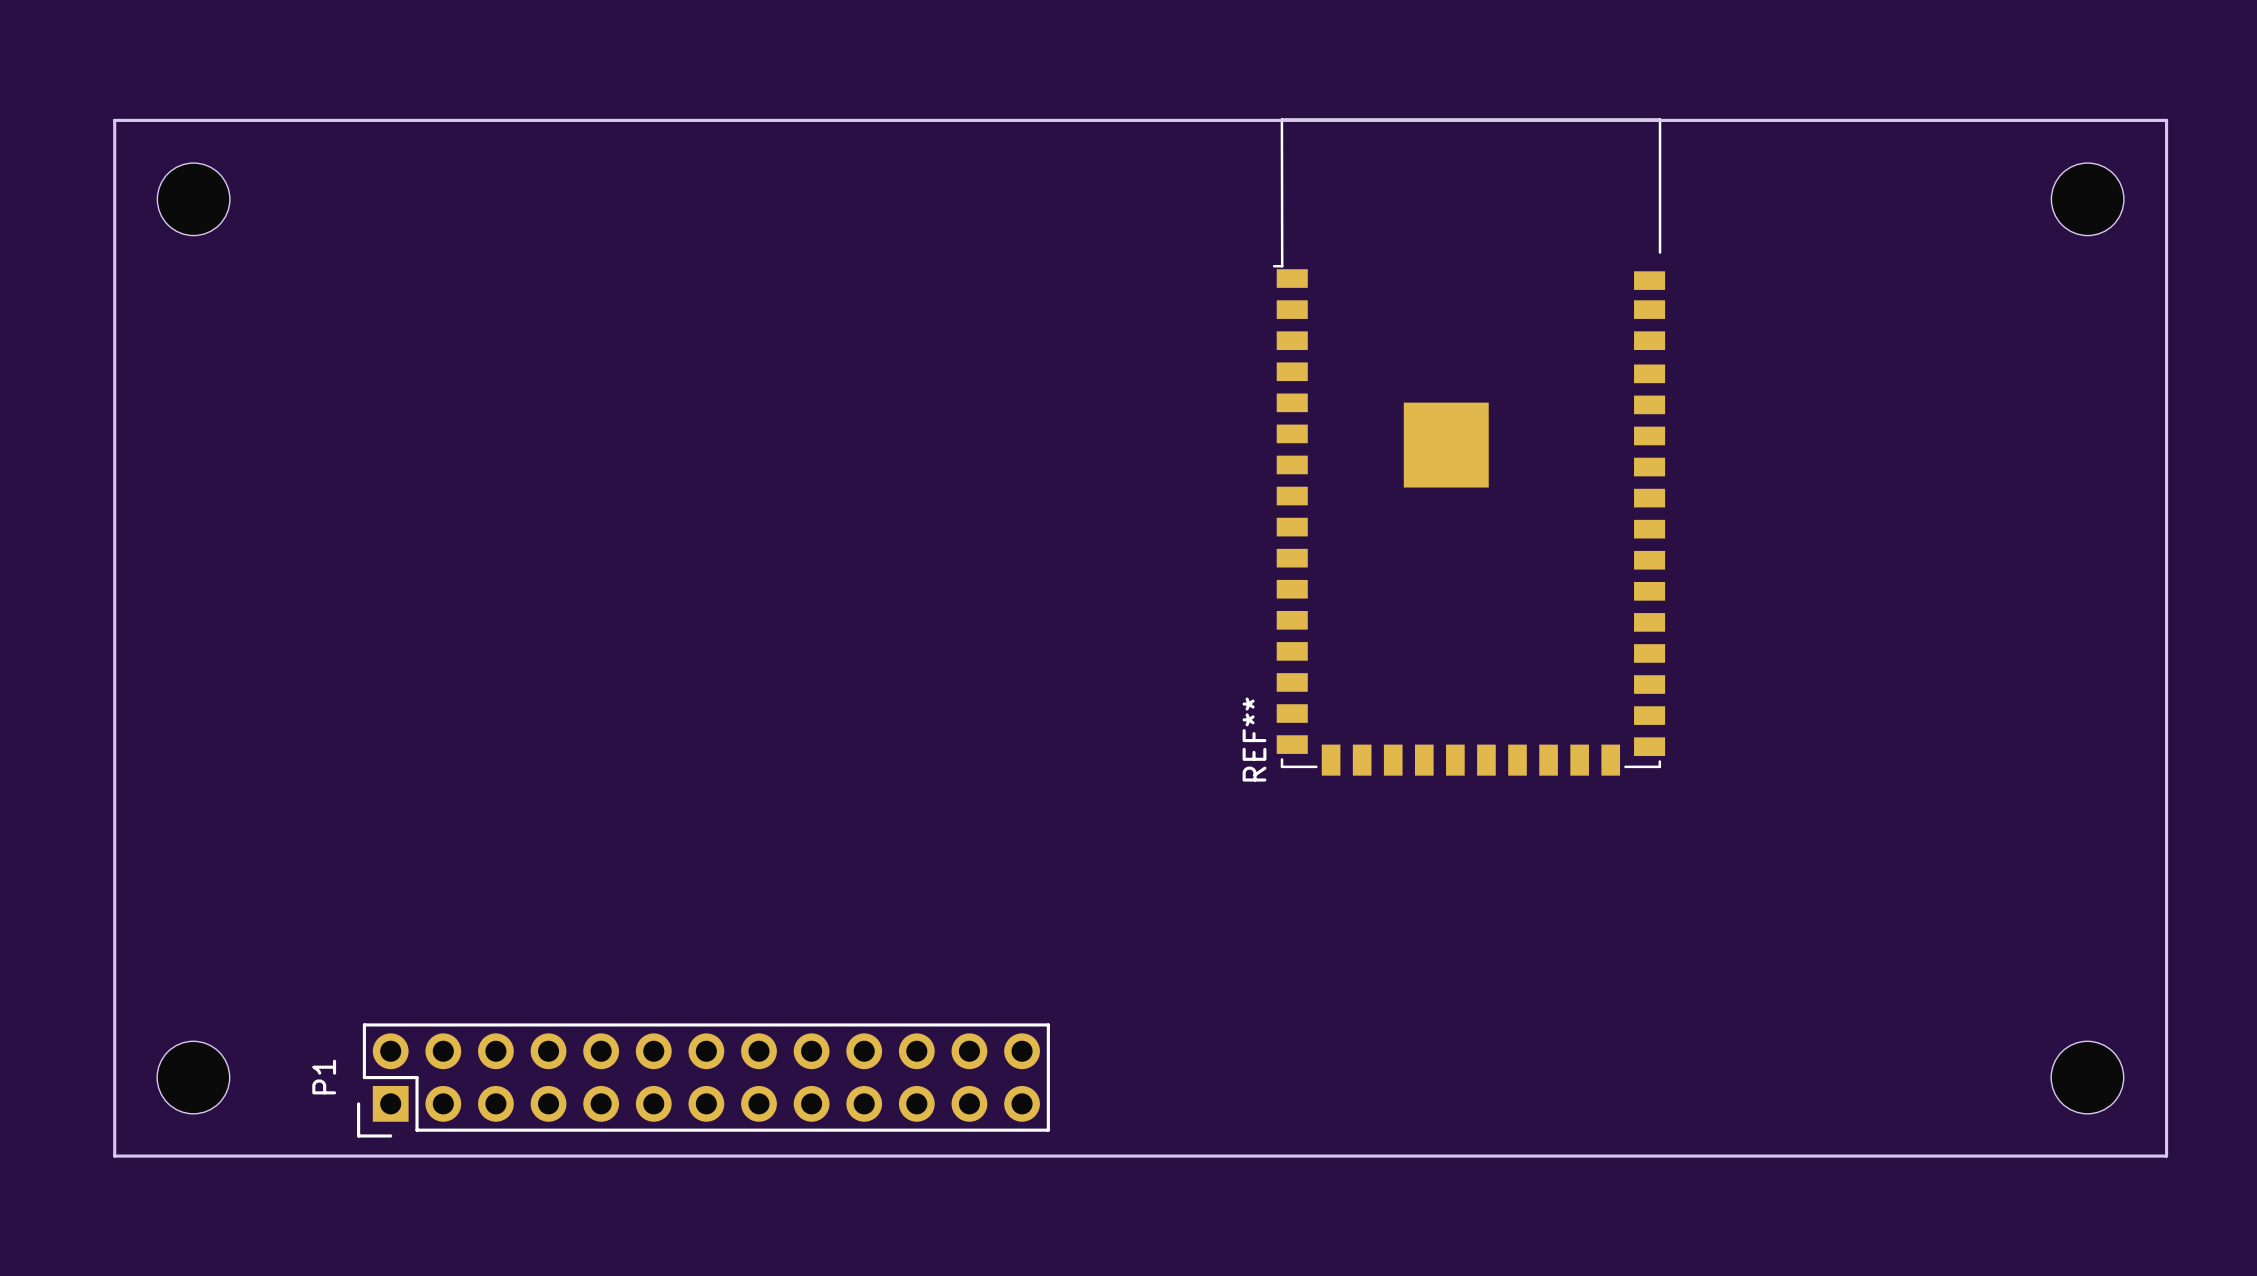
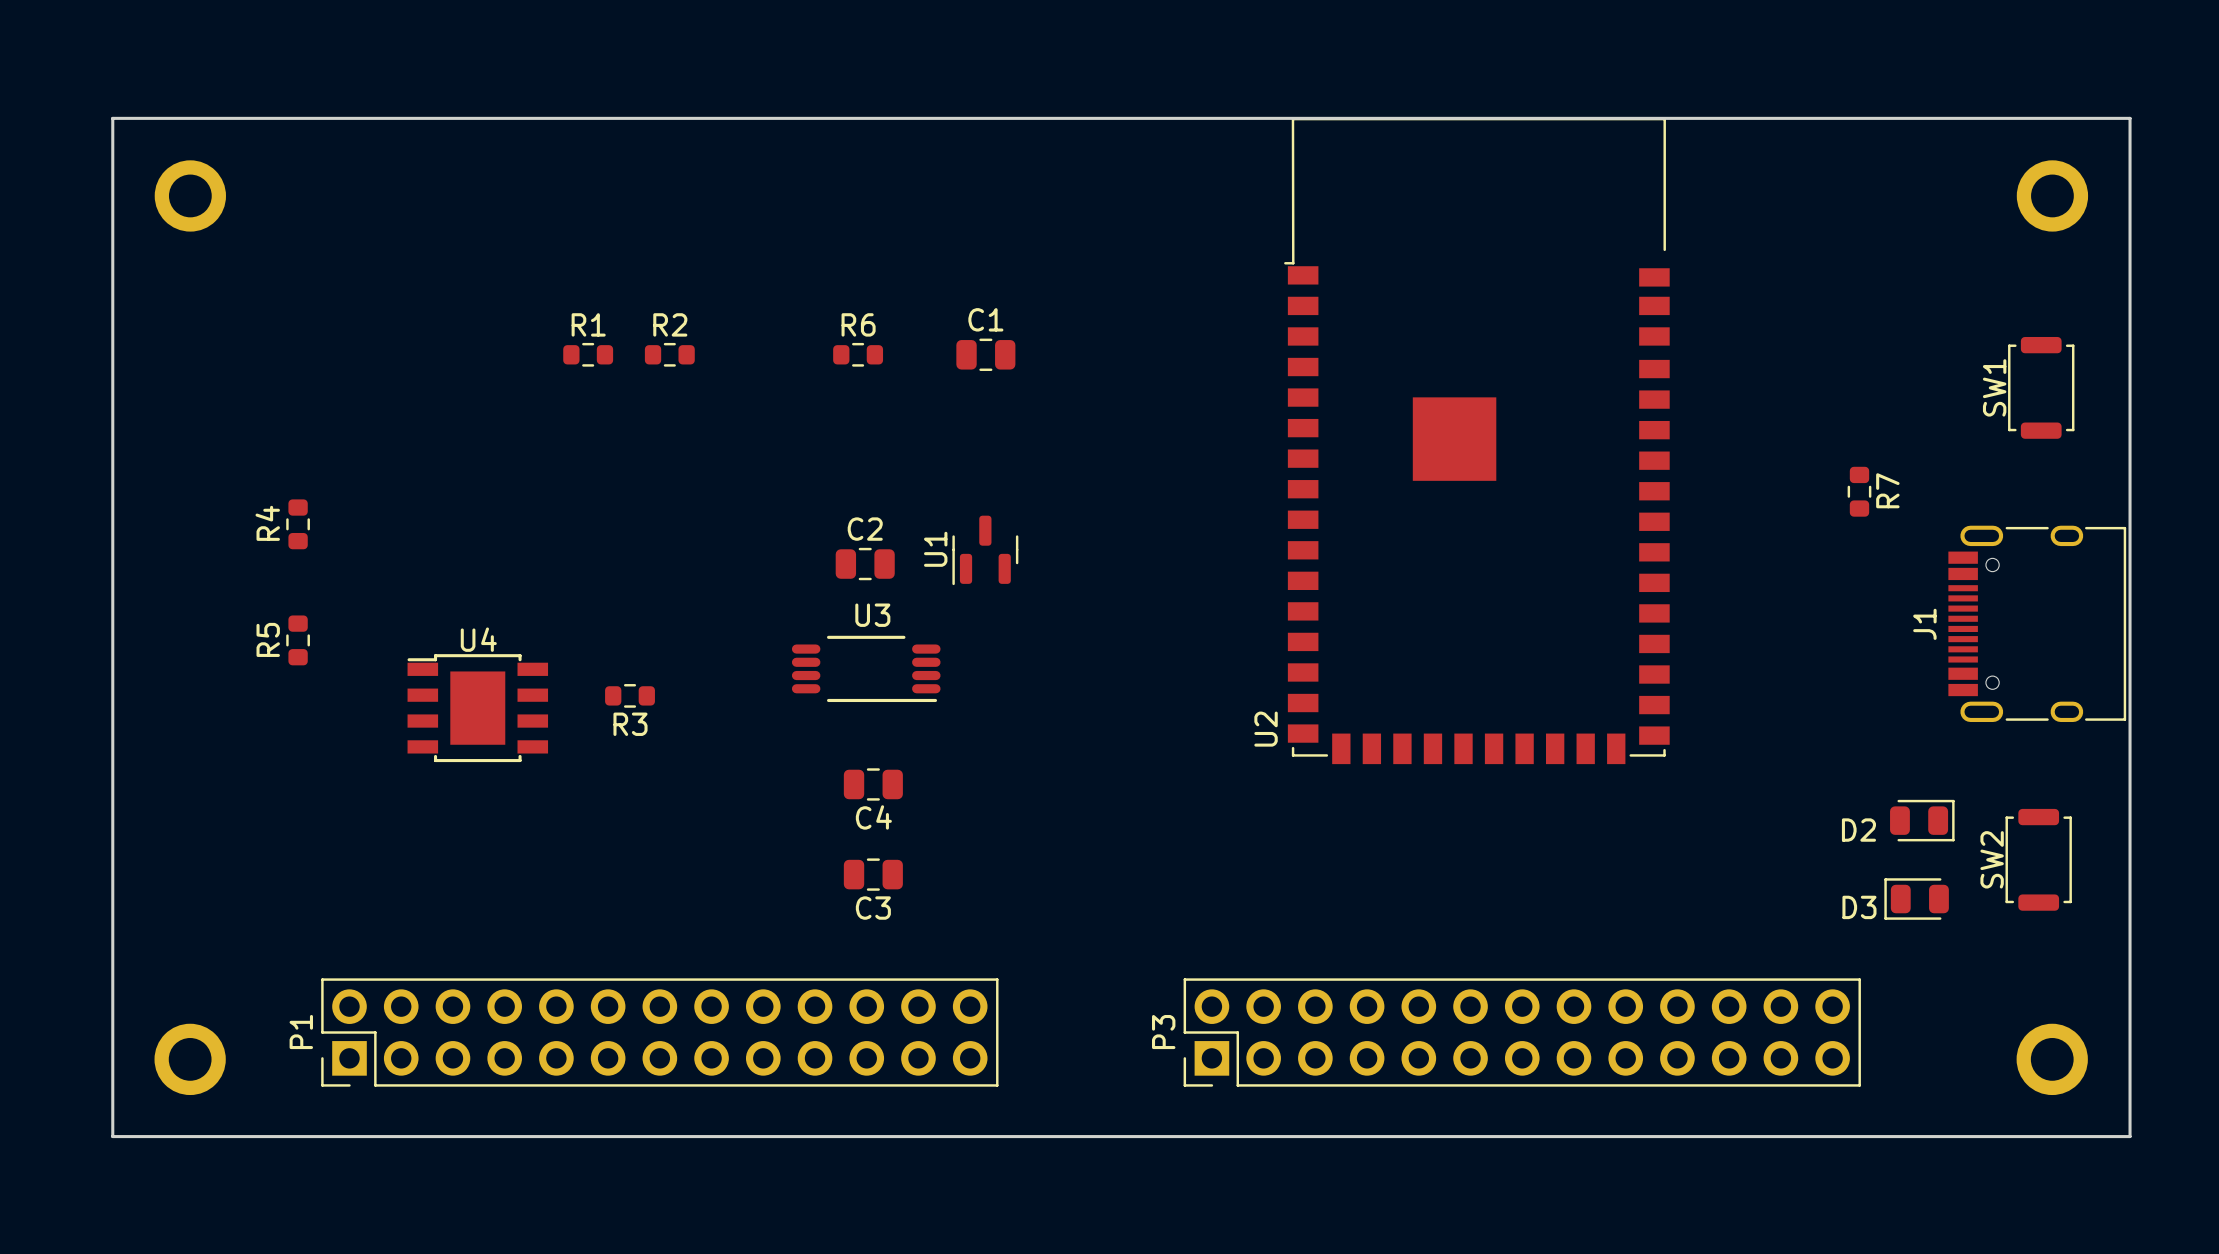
part footprint: [157, 163, 230, 236] -> [154, 160, 226, 232]
part footprint: [2051, 163, 2124, 236] -> [2016, 160, 2089, 232]
R1: none -> (588, 354)
R2: none -> (669, 354)
R6: none -> (858, 354)
C1: none -> (985, 354)
SW1: none -> (2041, 387)
REF**: (1468, 446) -> none
U2: none -> (1476, 440)
R7: none -> (1859, 491)
R4: none -> (298, 524)
U1: none -> (985, 550)
C2: none -> (865, 564)
J1: none -> (2037, 623)
R5: none -> (298, 640)
U3: none -> (866, 668)
R3: none -> (630, 695)
U4: none -> (477, 708)
C4: none -> (873, 784)
D2: none -> (1922, 820)
SW2: none -> (2038, 859)
C3: none -> (873, 874)
D3: none -> (1916, 899)
P1 footprint: [357, 1023, 1050, 1138] -> [321, 978, 999, 1087]
part footprint: [157, 1041, 230, 1114] -> [154, 1023, 226, 1096]
part footprint: [2051, 1041, 2124, 1114] -> [2016, 1023, 2088, 1096]
P3: none -> (1522, 1032)

